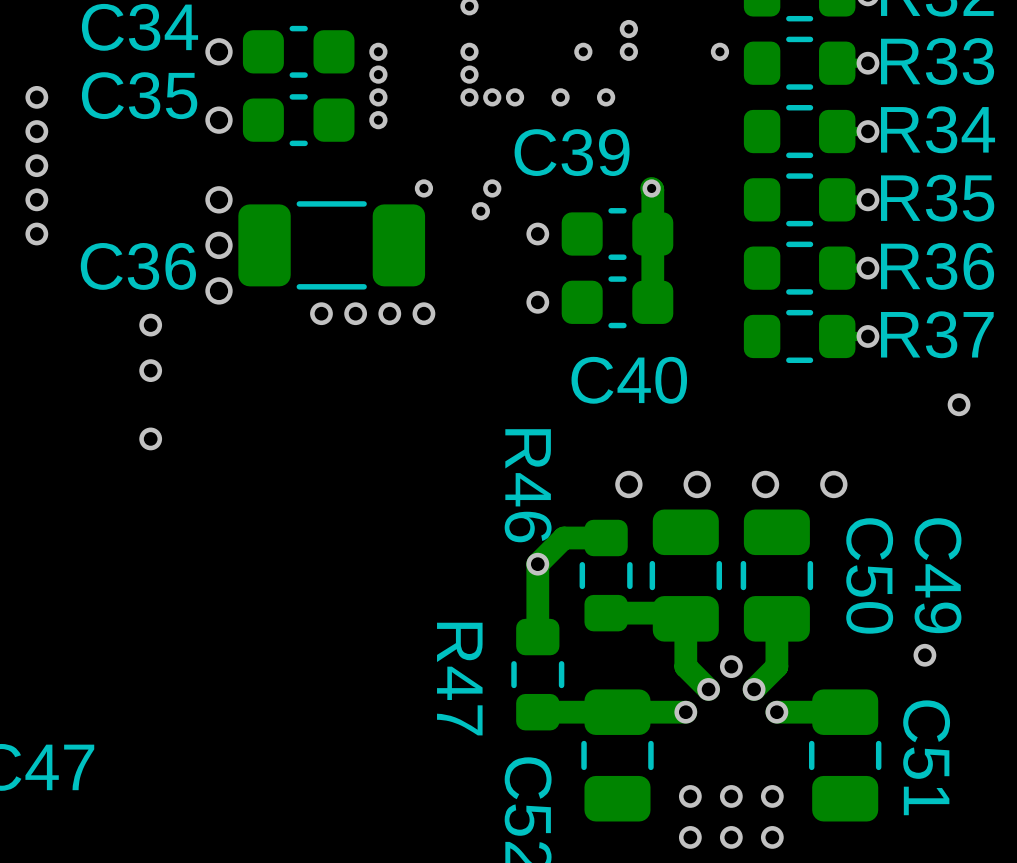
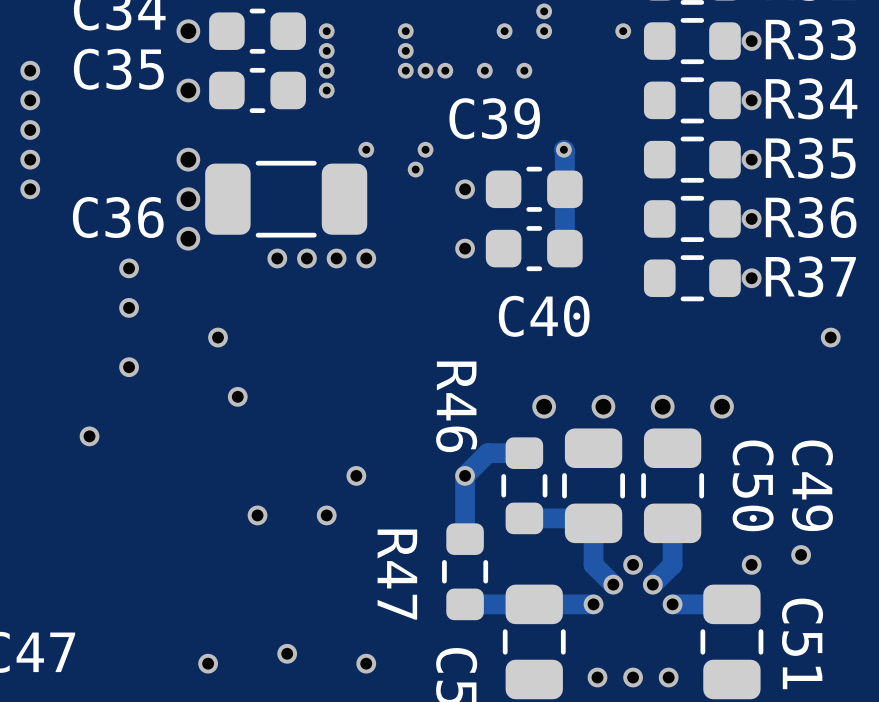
via: none -> (218, 337)
via: none -> (237, 396)
via: none -> (89, 436)
via: none -> (356, 475)
via: none -> (257, 515)
via: none -> (326, 515)
via: none -> (751, 564)
via: none -> (287, 653)
via: none -> (208, 663)
via: none -> (366, 663)

